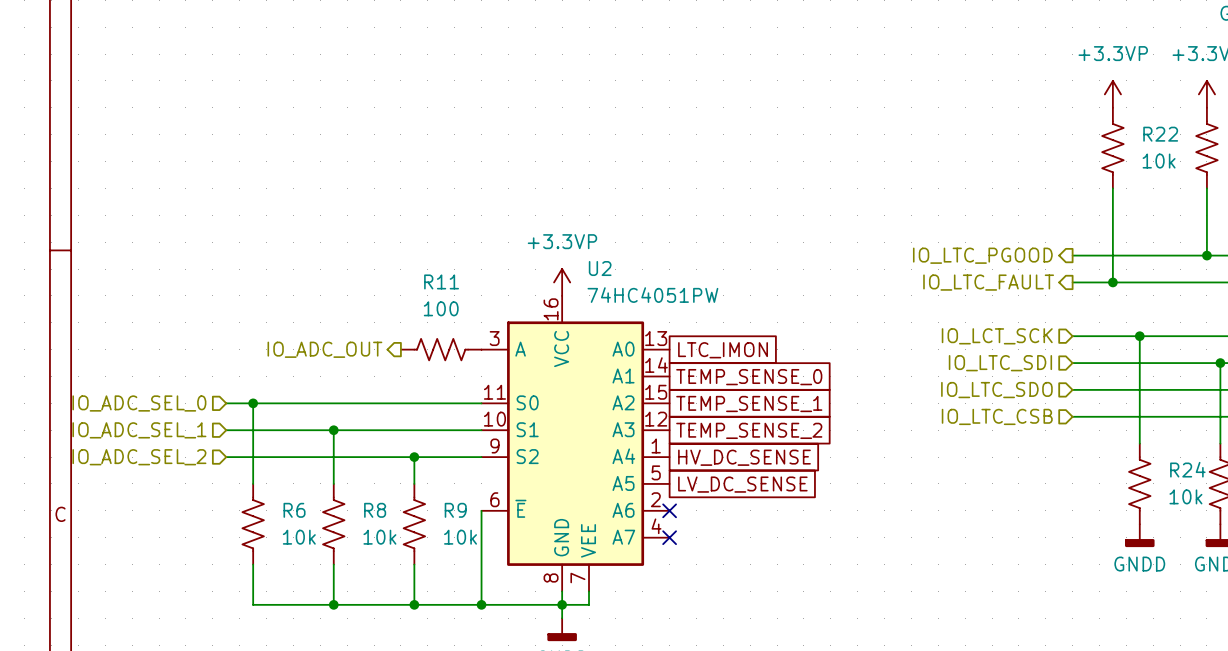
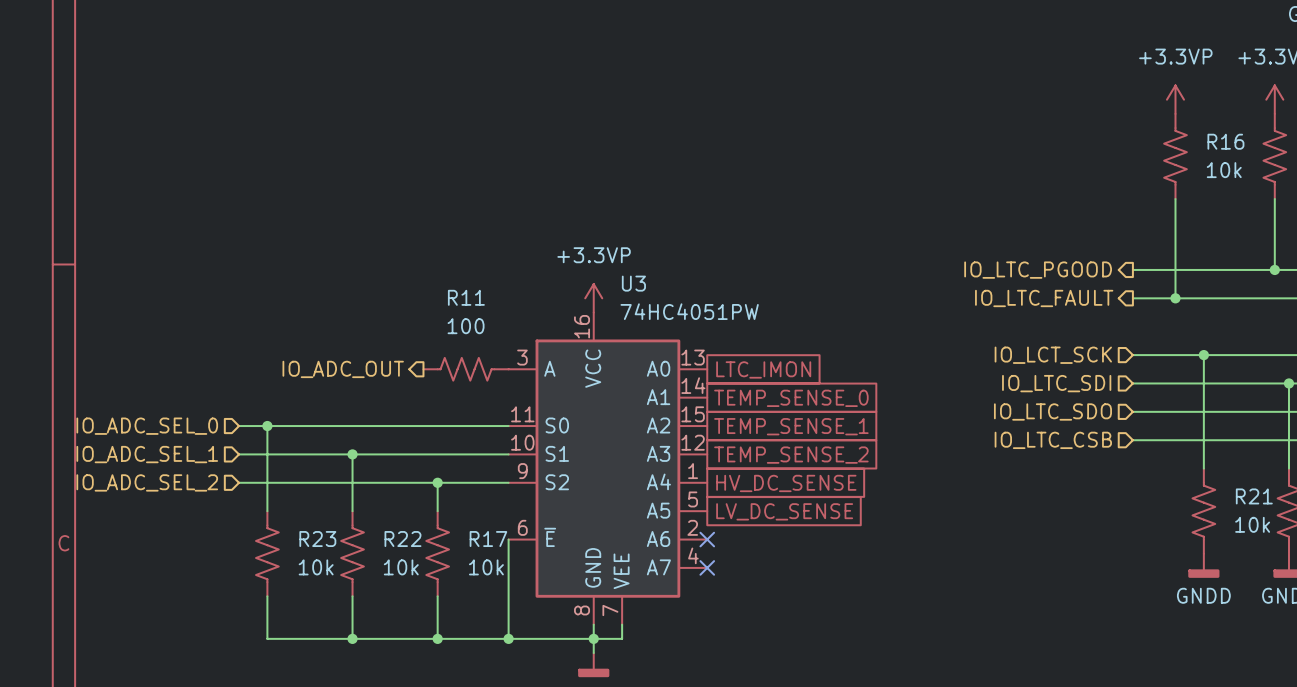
R22 name: R22 (1160, 134) -> R16 (1225, 141)
U2 name: U2 (600, 268) -> U3 (633, 283)
R24 name: R24 (1187, 469) -> R21 (1254, 496)
R6 name: R6 (294, 510) -> R23 (317, 539)
R8 name: R8 (375, 510) -> R22 (402, 539)
R9 name: R9 (455, 510) -> R17 (488, 539)

